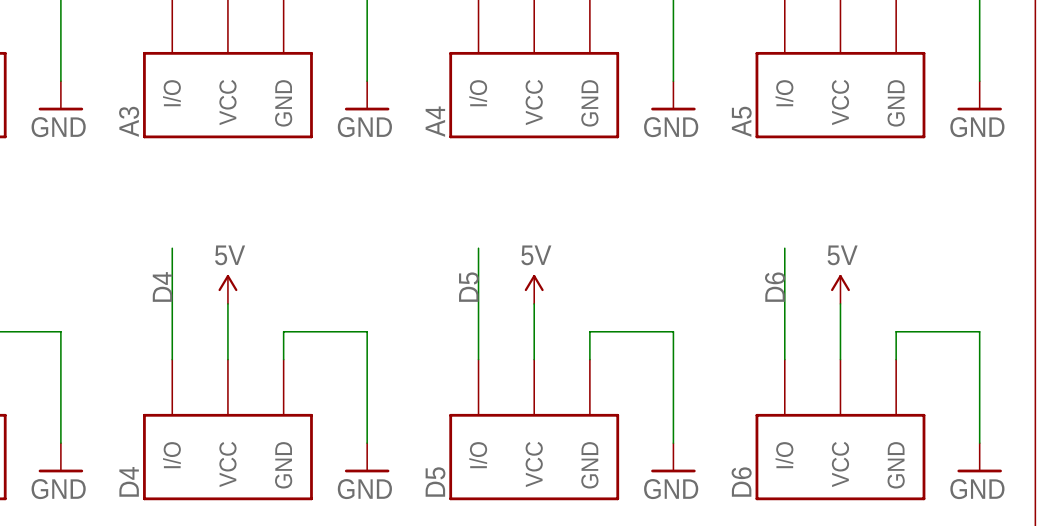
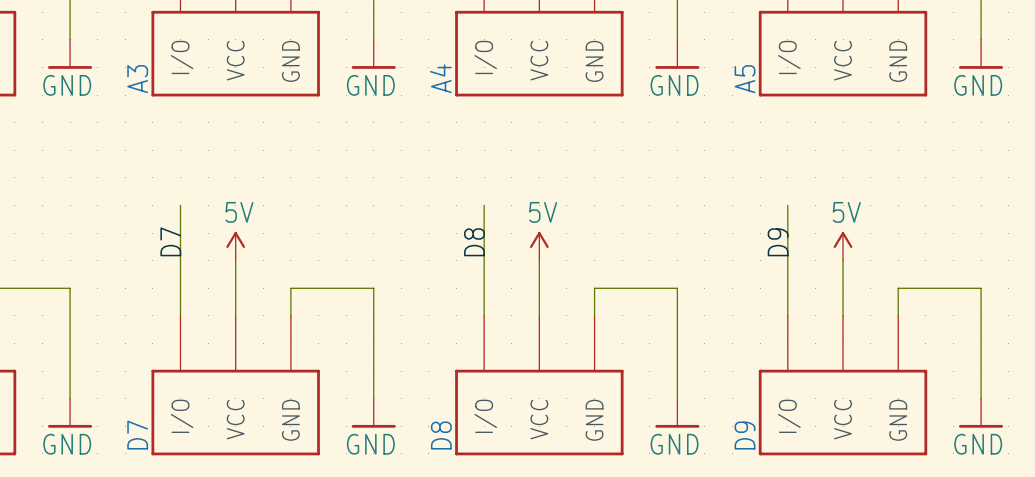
label: D4 (162, 286) -> D7 (170, 241)
label: D5 (468, 287) -> D8 (474, 242)
label: D6 (775, 287) -> D9 (778, 242)
D4 name: D4 (129, 481) -> D7 (137, 435)
D5 name: D5 (435, 482) -> D8 (441, 435)
D6 name: D6 (741, 482) -> D9 (745, 435)

